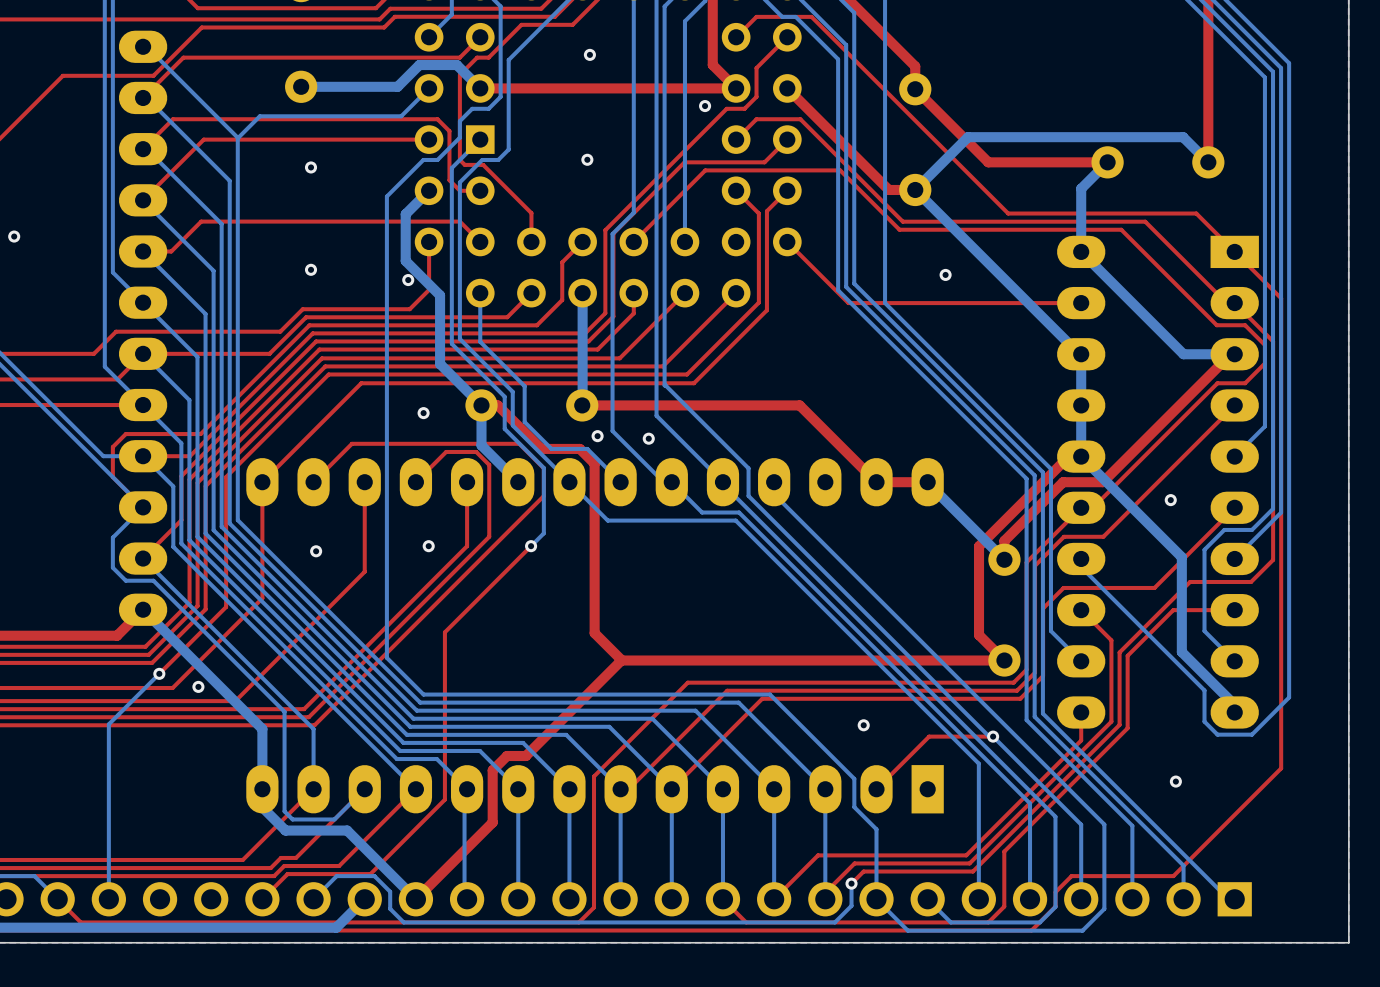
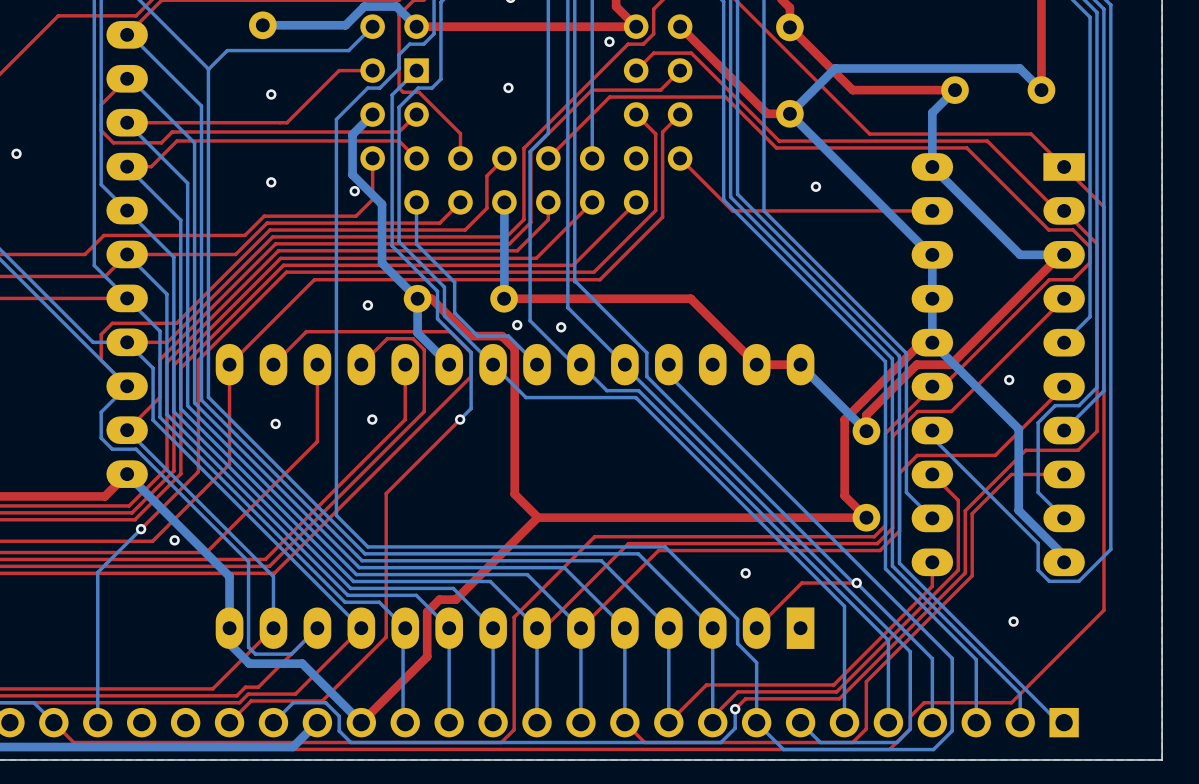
top track: (390, 139) (203, 139) (143, 200) -> (339, 70) (286, 122) (127, 122)
top track: (143, 149) (173, 119) (437, 119) (449, 131) (449, 180) (460, 190) (480, 190) -> (127, 78) (101, 104) (101, 130) (113, 142) (161, 142) (172, 132) (399, 132) (416, 114)

